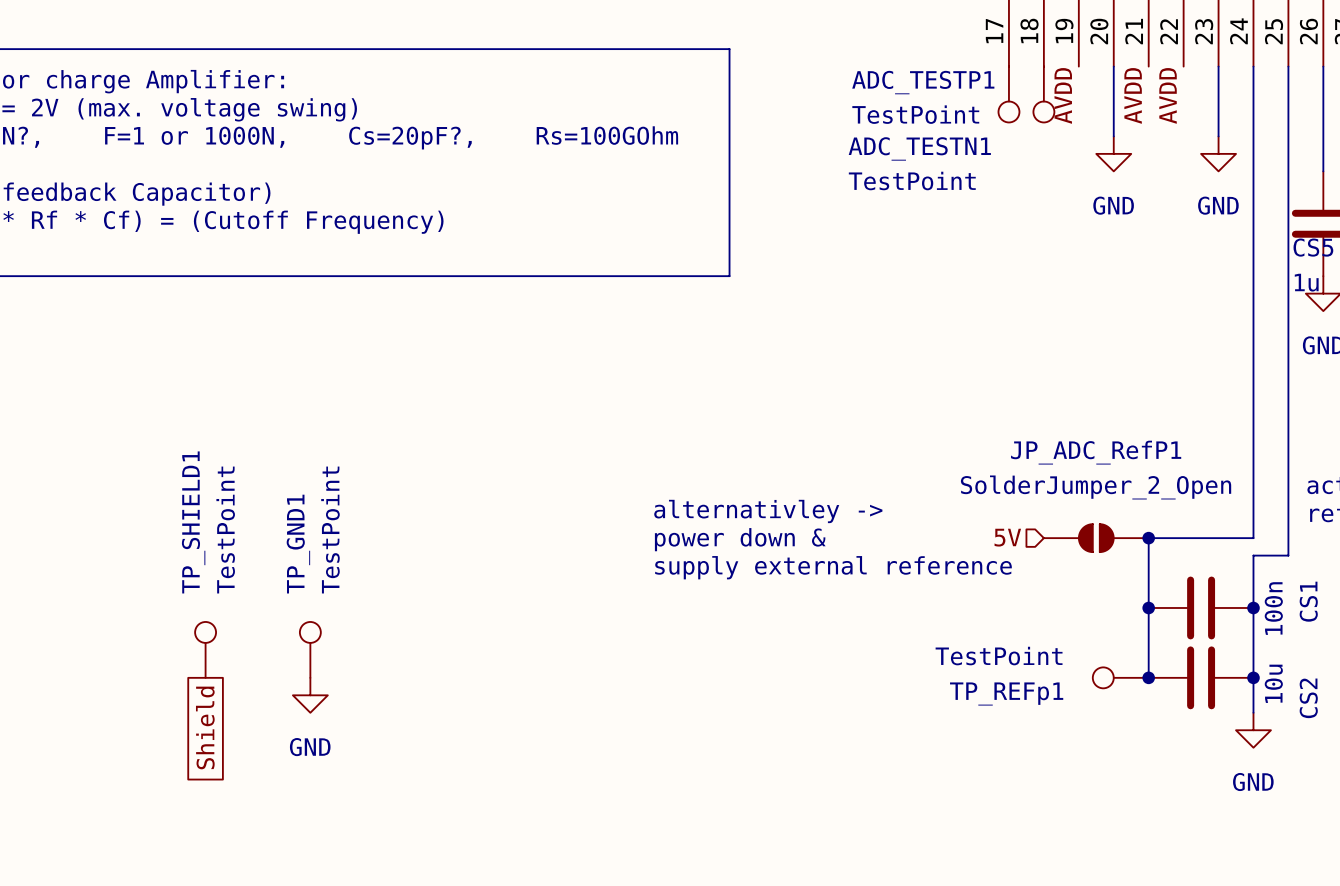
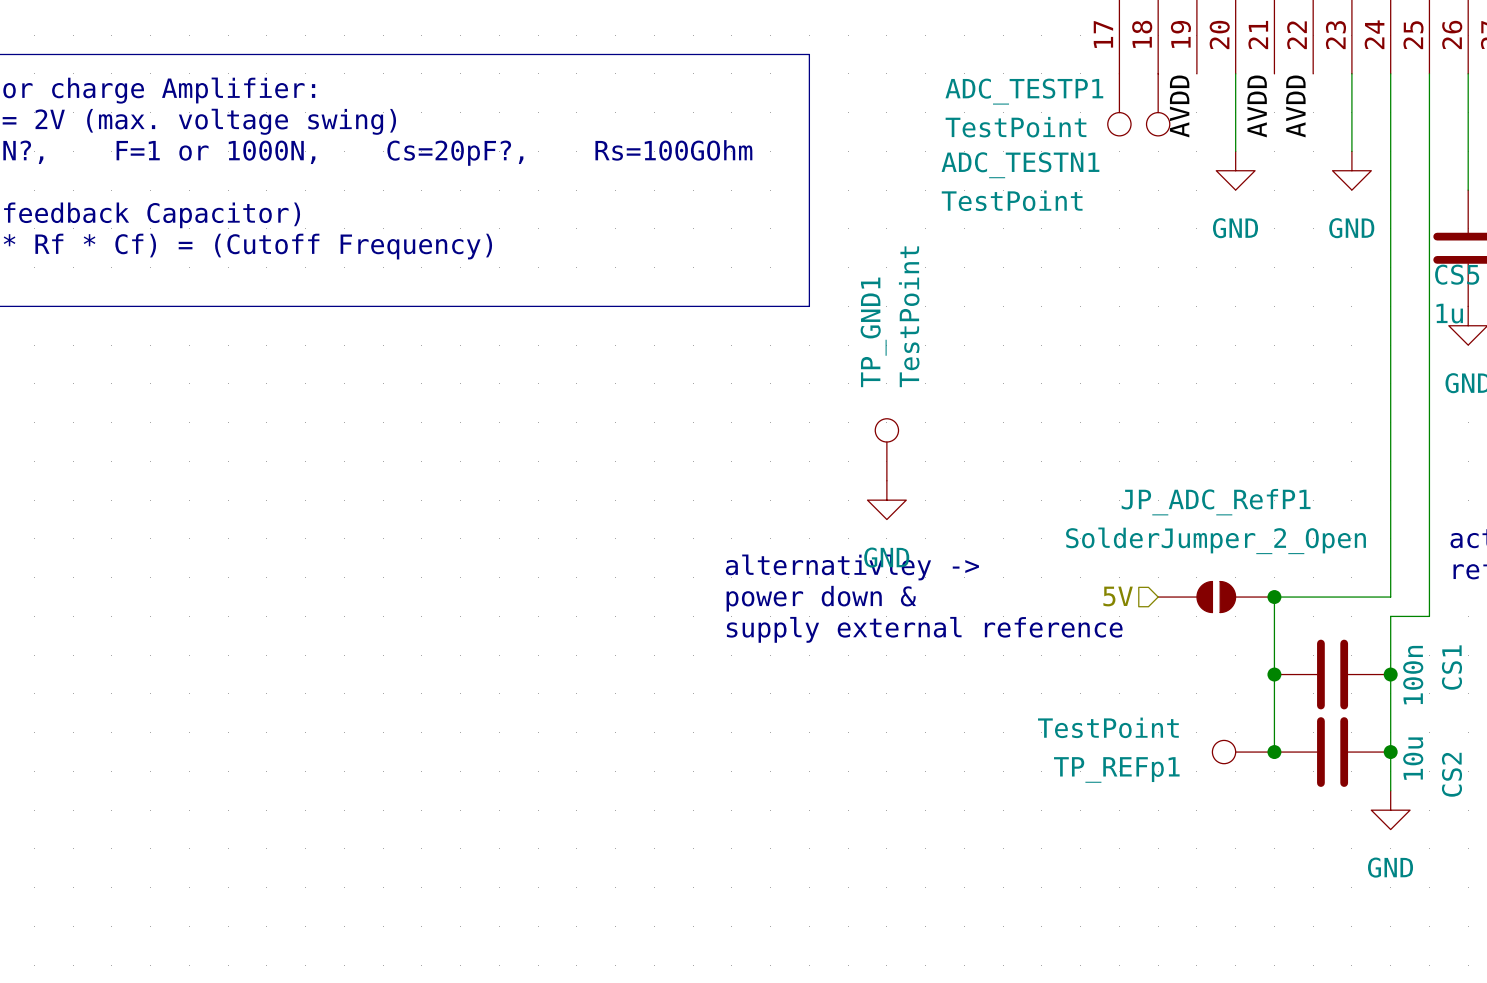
power symbol: none -> GND (886, 500)
TP_SHIELD1: TestPoint (205, 649) -> none
TP_GND1 position: (310, 649) -> (886, 449)
power symbol: GND (310, 695) -> none
global label: Shield (205, 727) -> none

